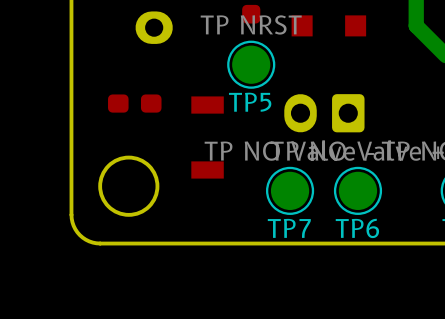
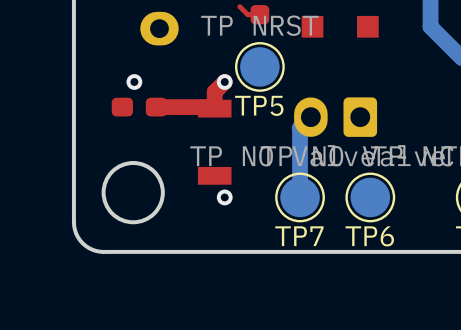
top track: none -> (239, 6) (247, 14) (259, 14)
via: none -> (134, 82)
top track: none -> (224, 82) (214, 92) (214, 108) (213, 107) (156, 107)
via: none -> (224, 82)
bottom track: none -> (310, 117) (300, 127) (300, 197)
via: none -> (224, 197)

